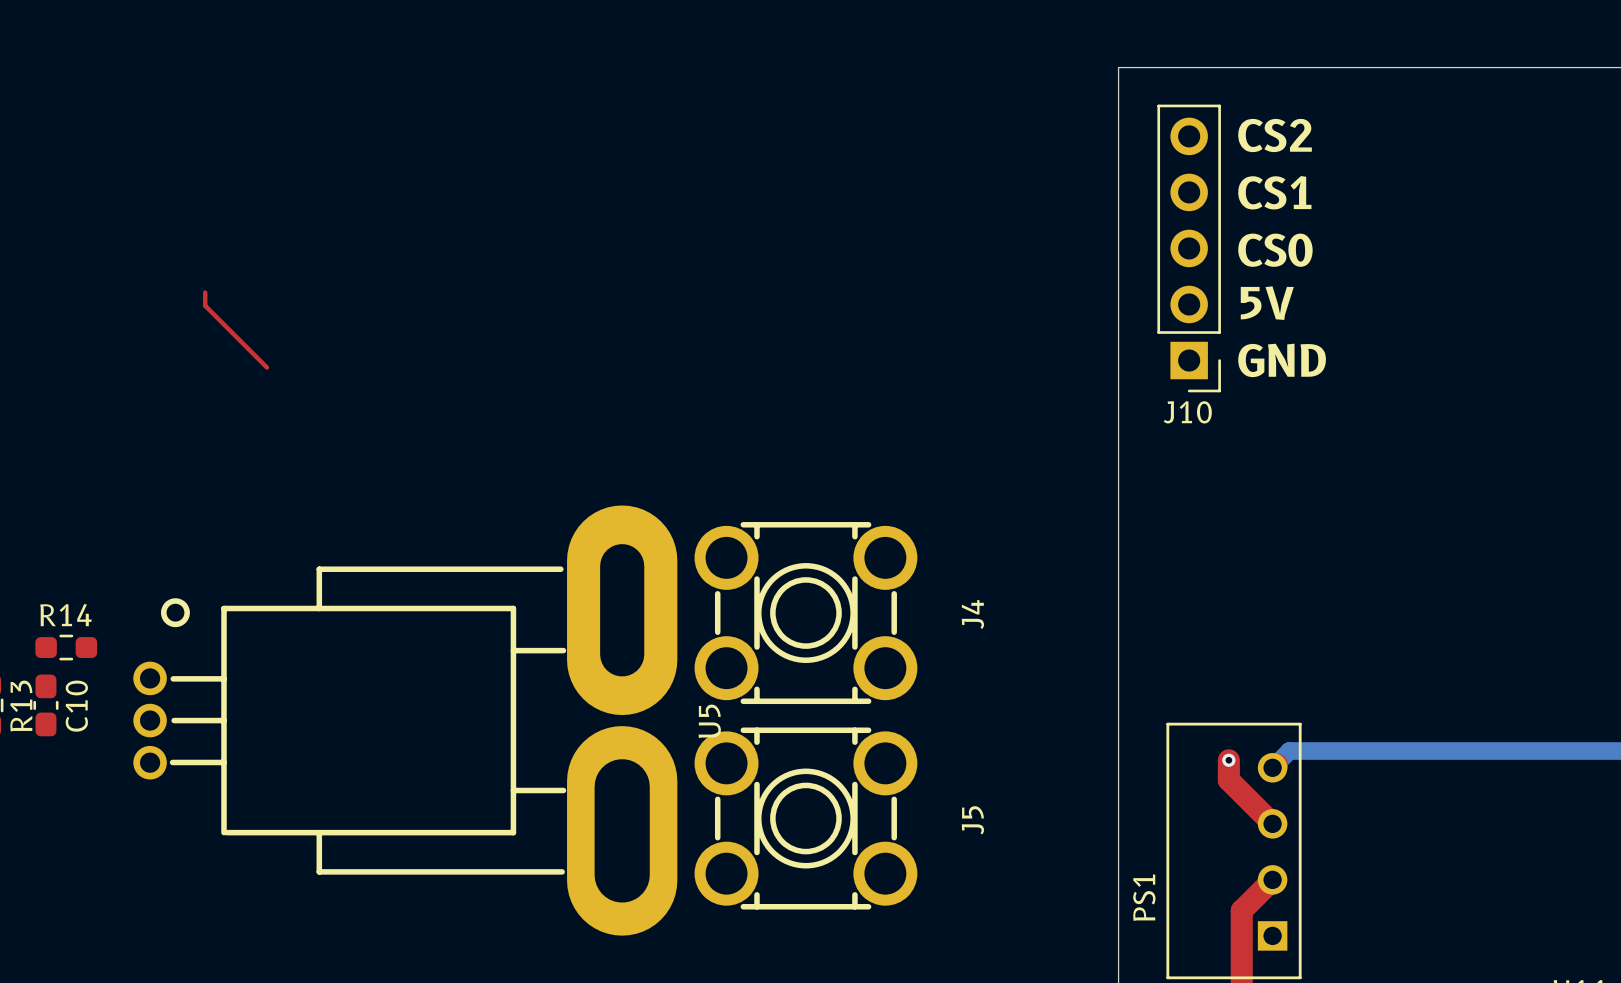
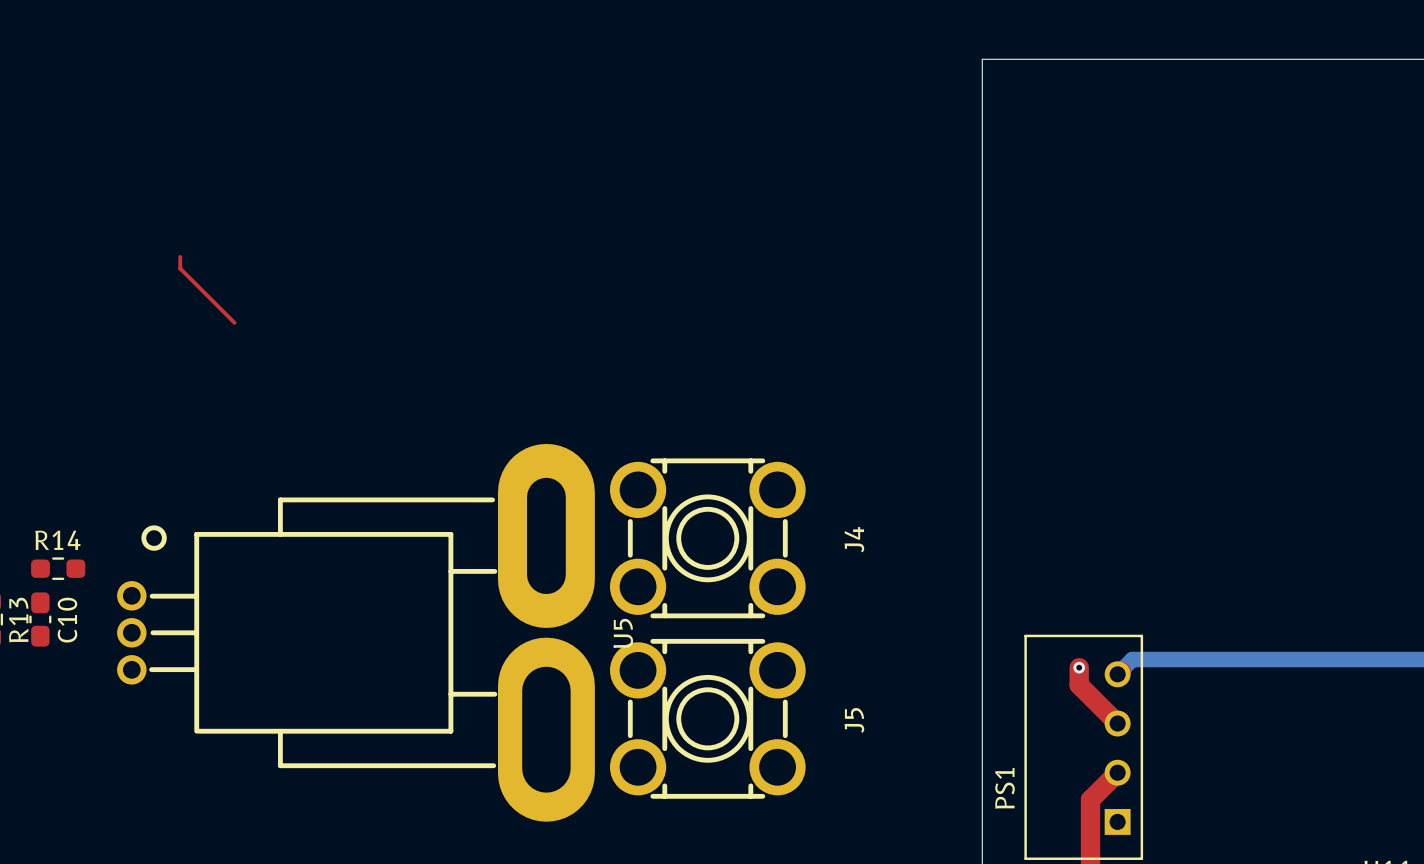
text: CS2 (1275, 135) -> none
text: CS1 (1274, 192) -> none
J10: (1189, 248) -> none
text: CS0 (1275, 250) -> none
text: 5V (1267, 303) -> none
text: GND (1282, 360) -> none

